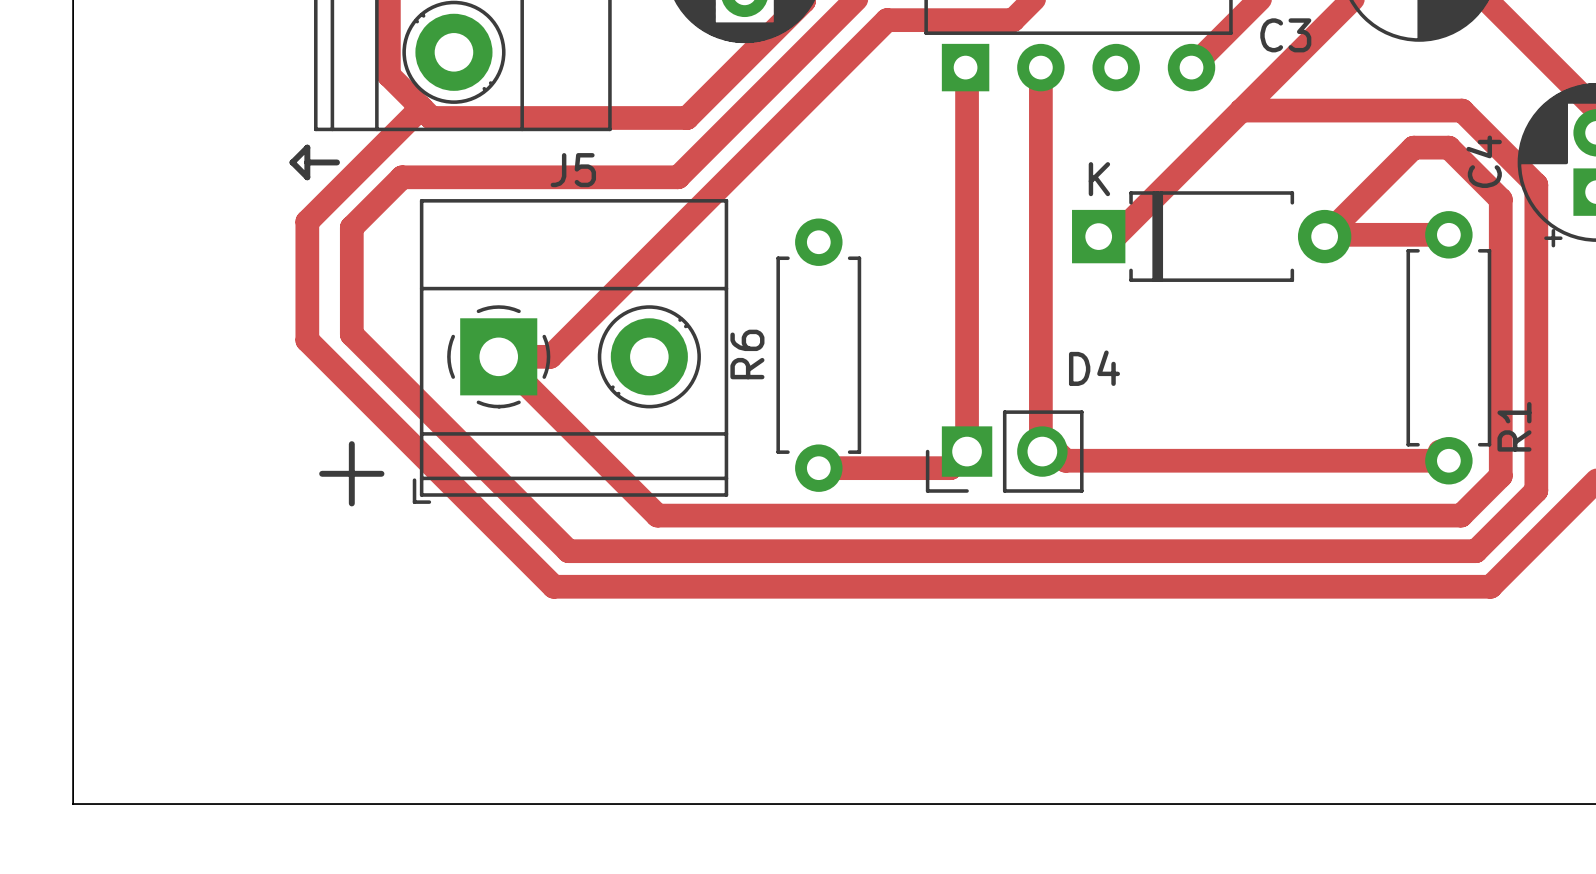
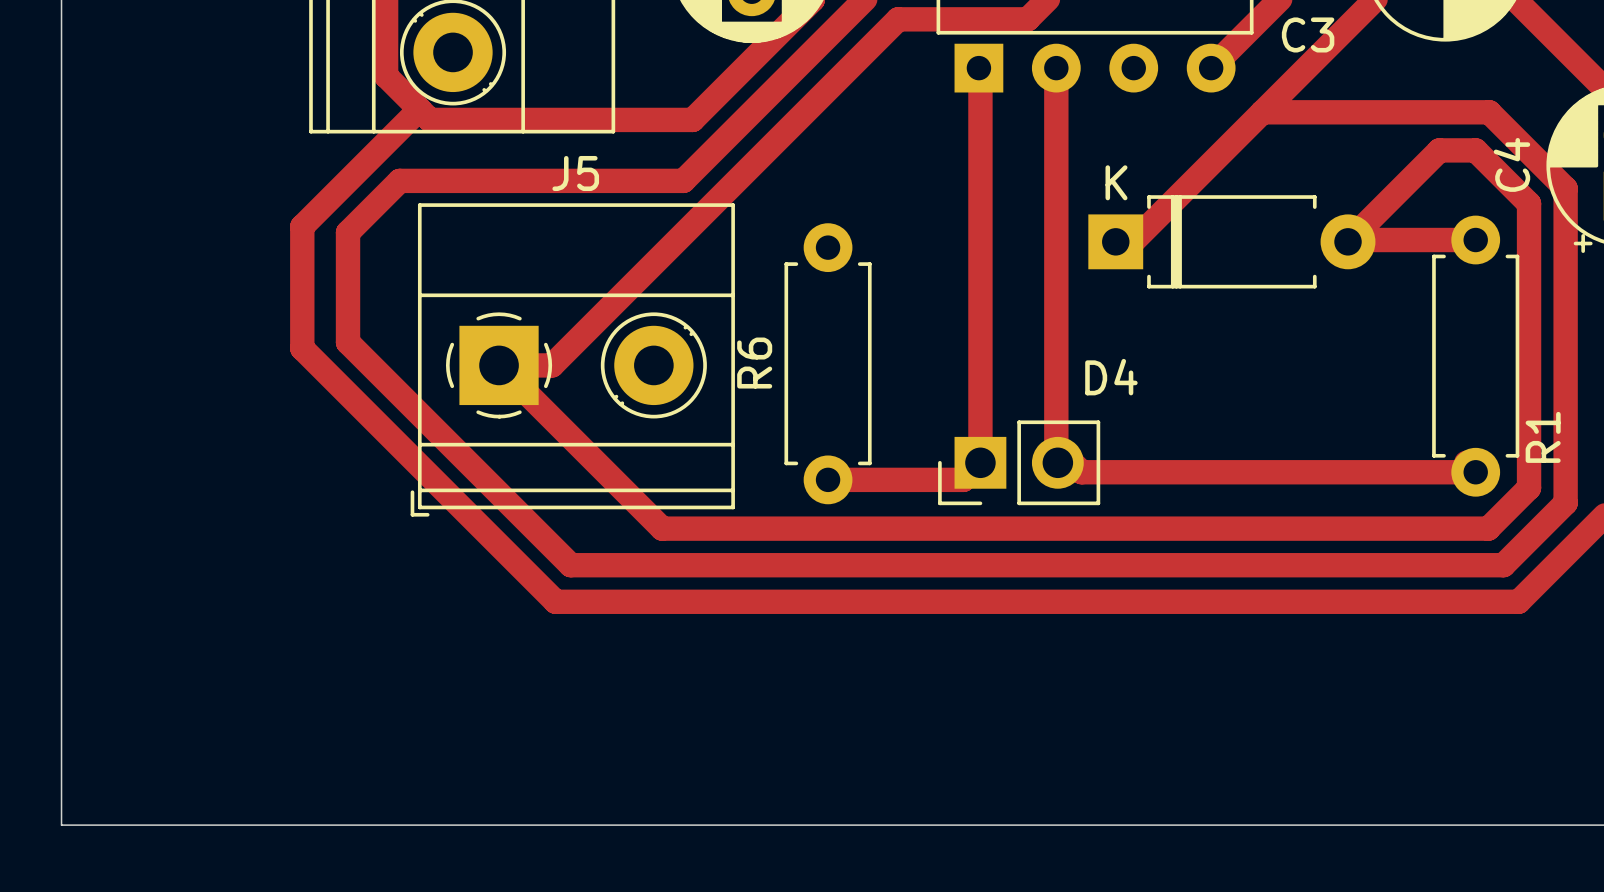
line: (307, 147) (292, 162) (307, 177) (307, 147) -> none
line: (307, 162) (336, 162) -> none
line: (351, 444) (351, 503) -> none
line: (322, 473) (381, 473) -> none

